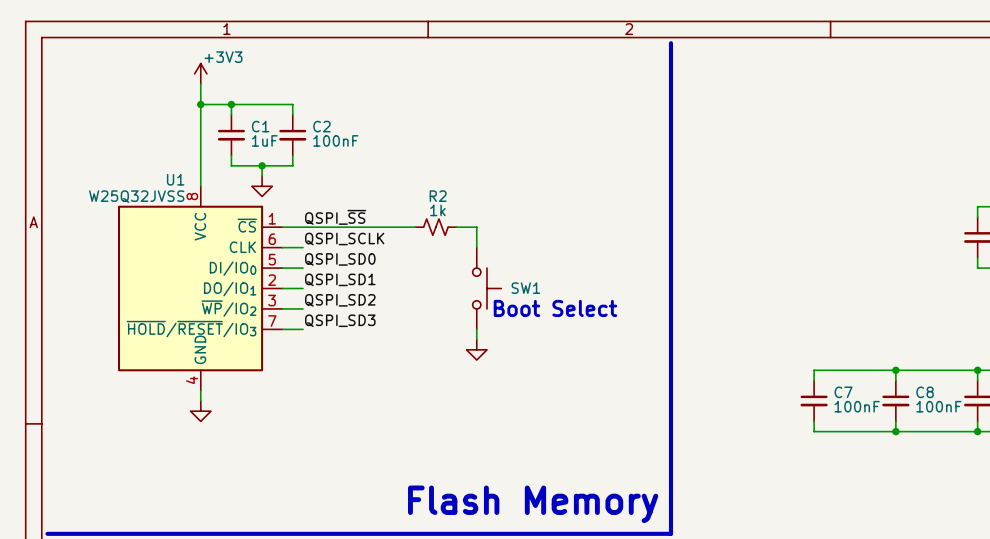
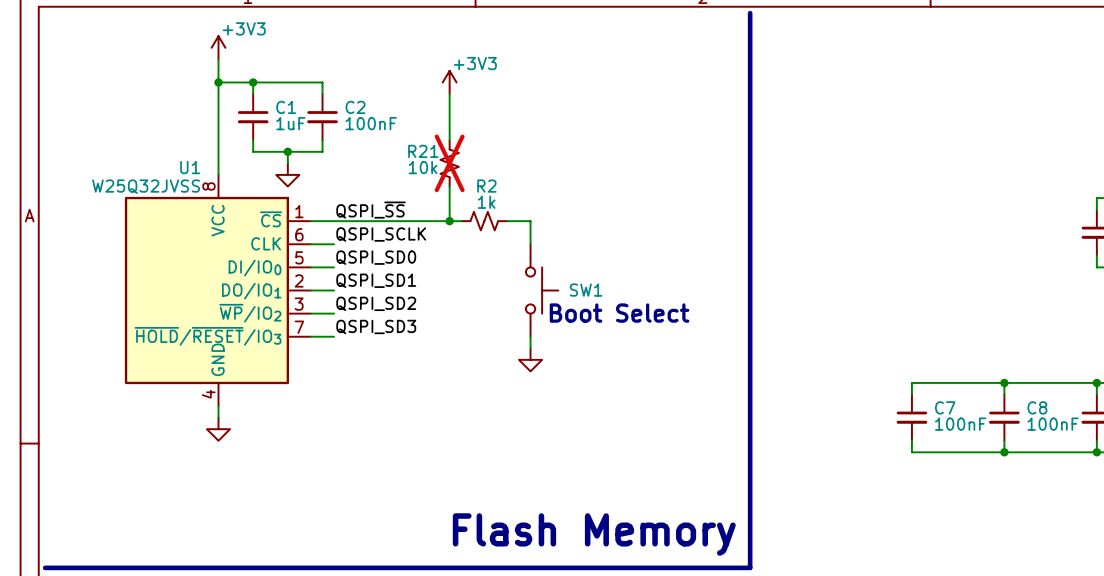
power symbol: none -> +3V3 (449, 82)
wire: none -> (449, 94) (449, 140)
R21: none -> 10k (449, 163)
wire: none -> (449, 186) (449, 221)
junction: none -> (449, 221)

